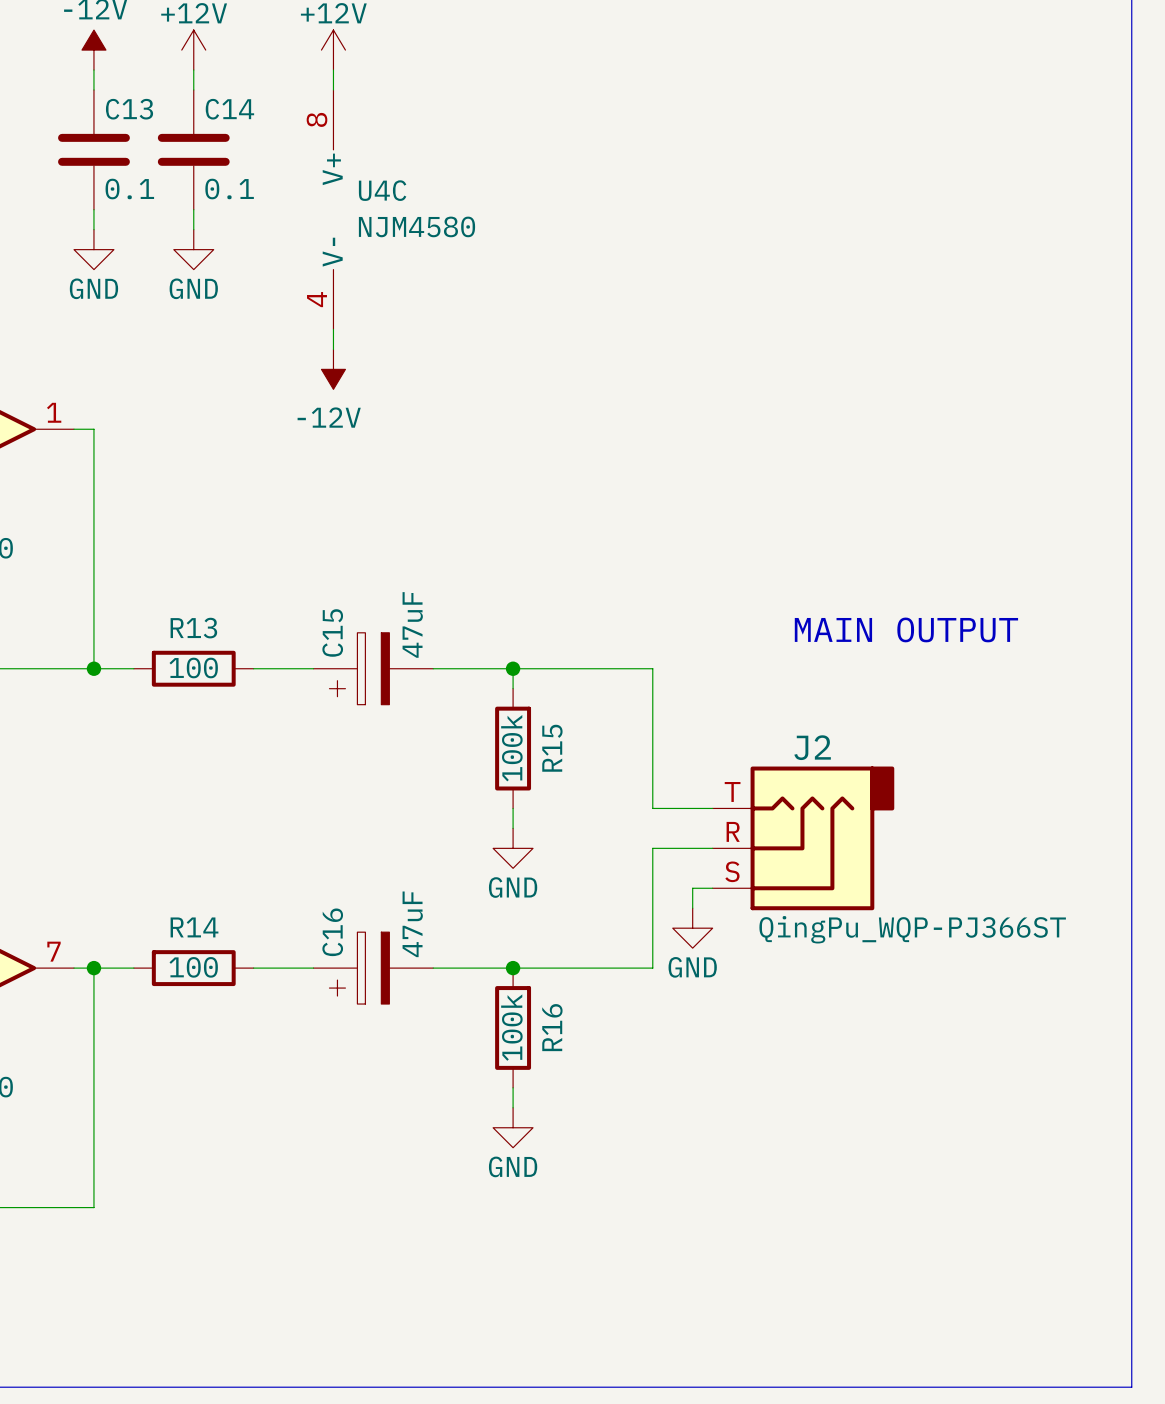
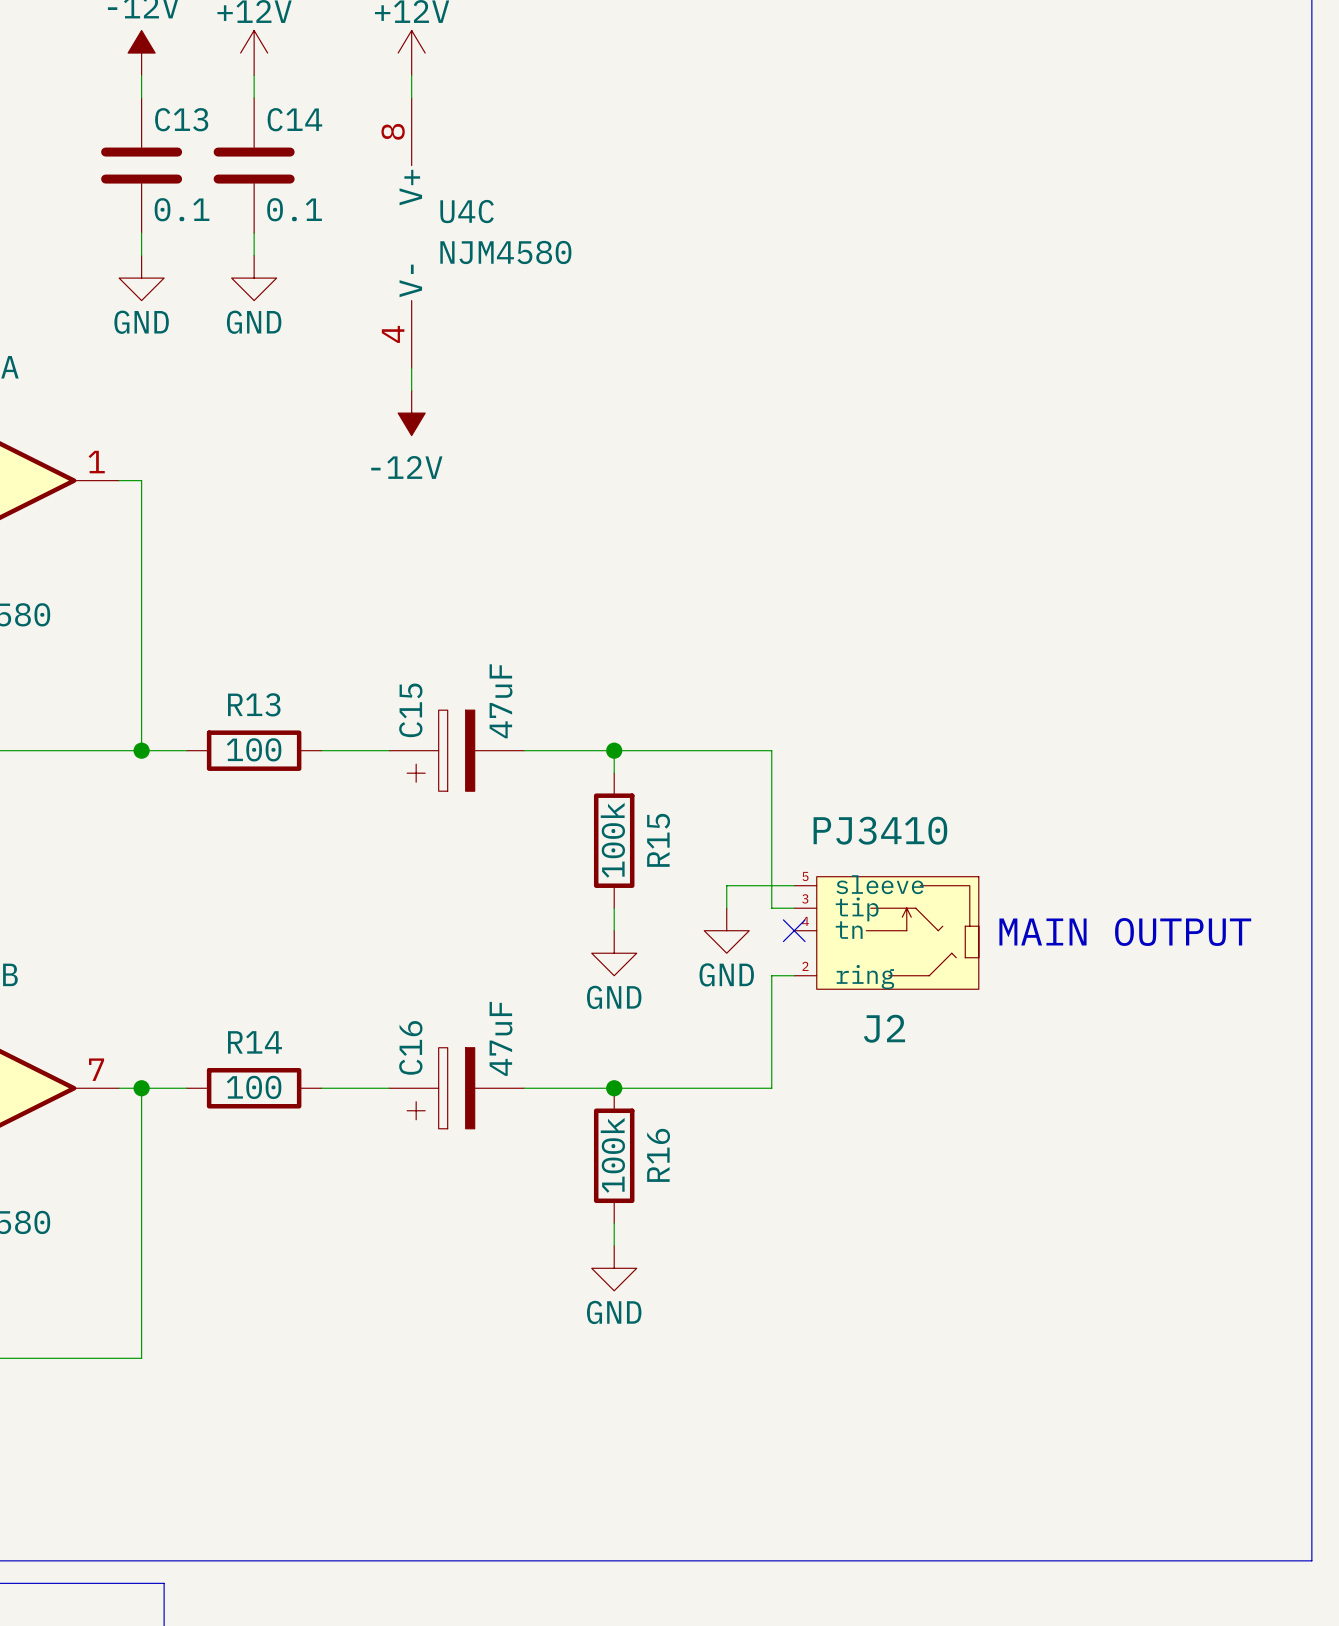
text position: MAIN OUTPUT (906, 629) -> MAIN OUTPUT (1125, 931)
J2 name position: J2 (812, 747) -> J2 (884, 1028)
J2 symbol: [712, 766, 895, 911] -> [794, 876, 979, 990]
wire: none -> (794, 885) (726, 885) (726, 908)
no-connect mark: none -> (794, 930)
wire: (712, 848) (652, 848) (652, 868) -> (794, 975) (771, 975)
wire: (712, 888) (692, 888) (692, 908) -> none
power symbol position: GND (692, 928) -> GND (726, 930)
J2 value: QingPu_WQP-PJ366ST (912, 929) -> PJ3410 (880, 830)

